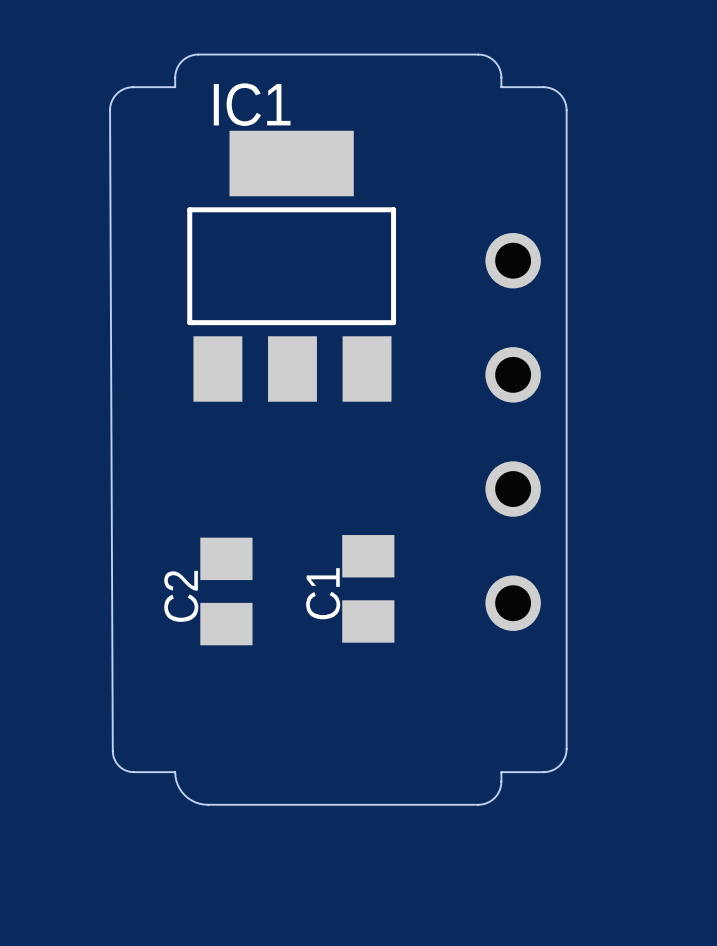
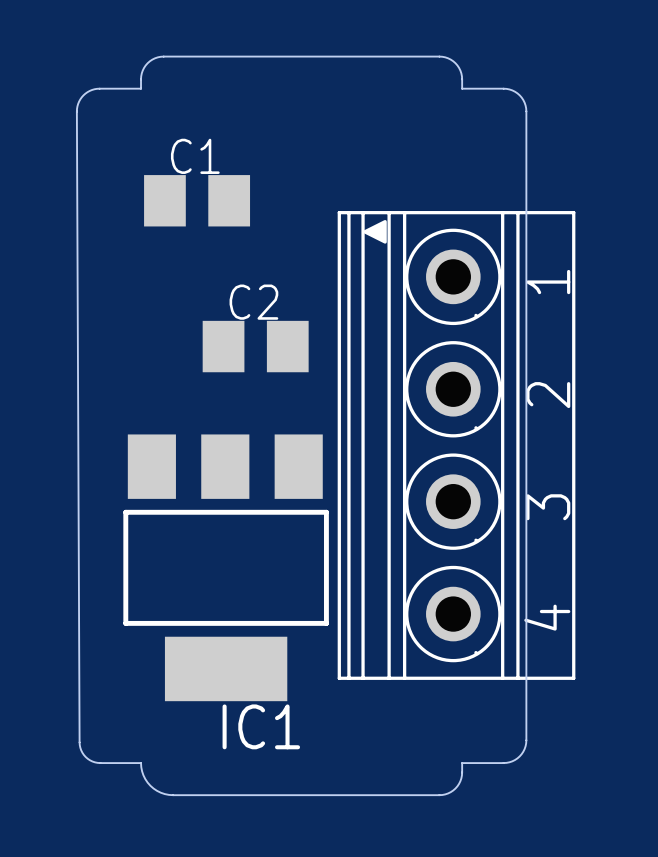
IC1 rotation: 0° (291, 266) -> 180° (226, 567)
IC1 position: (291, 266) -> (226, 567)
part side: top (513, 431) -> bottom (456, 445)
C1 rotation: 0° (368, 588) -> 90° clockwise (197, 200)
C1 position: (368, 588) -> (197, 200)
C2 rotation: 0° (226, 591) -> 90° clockwise (255, 346)
C2 position: (226, 591) -> (255, 346)

